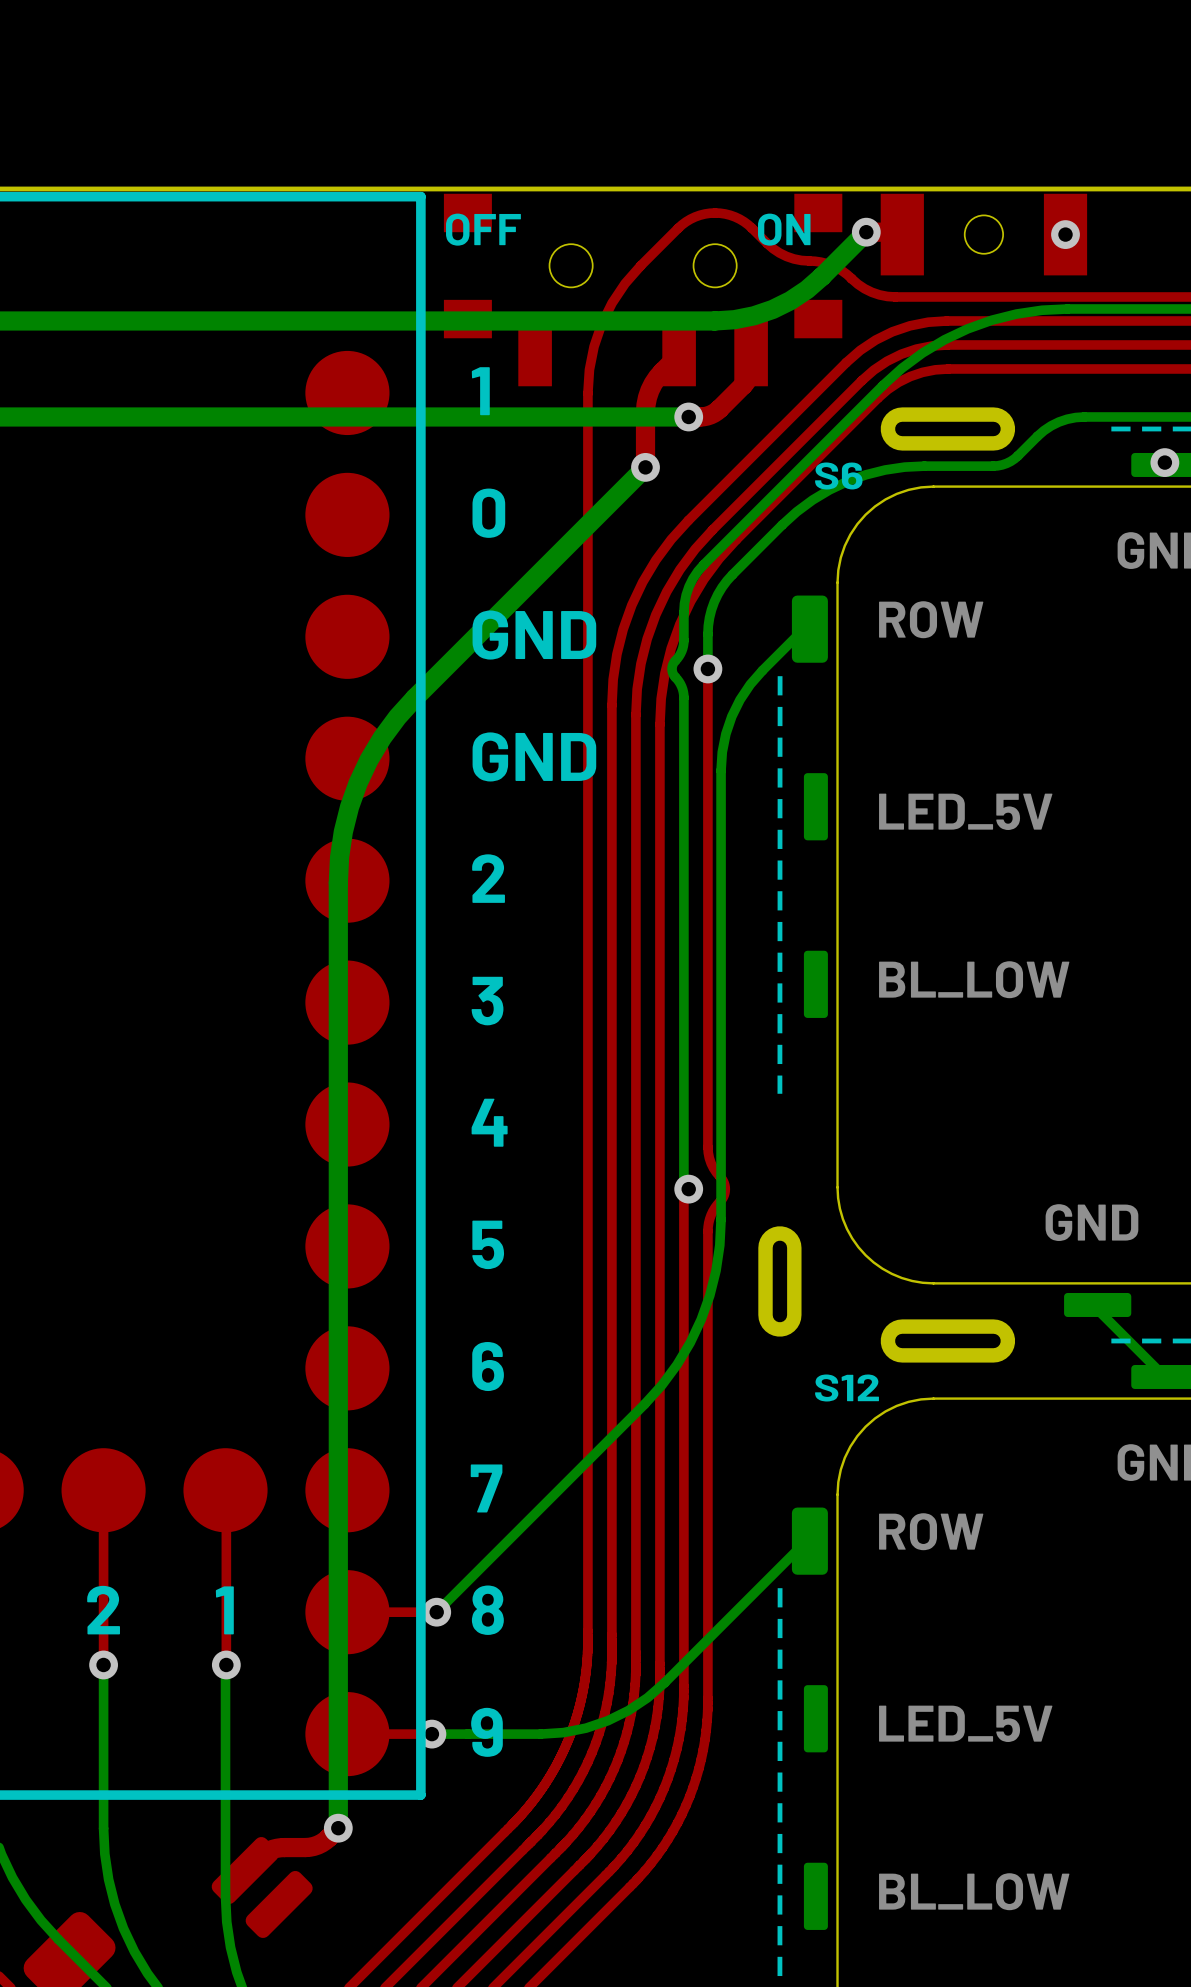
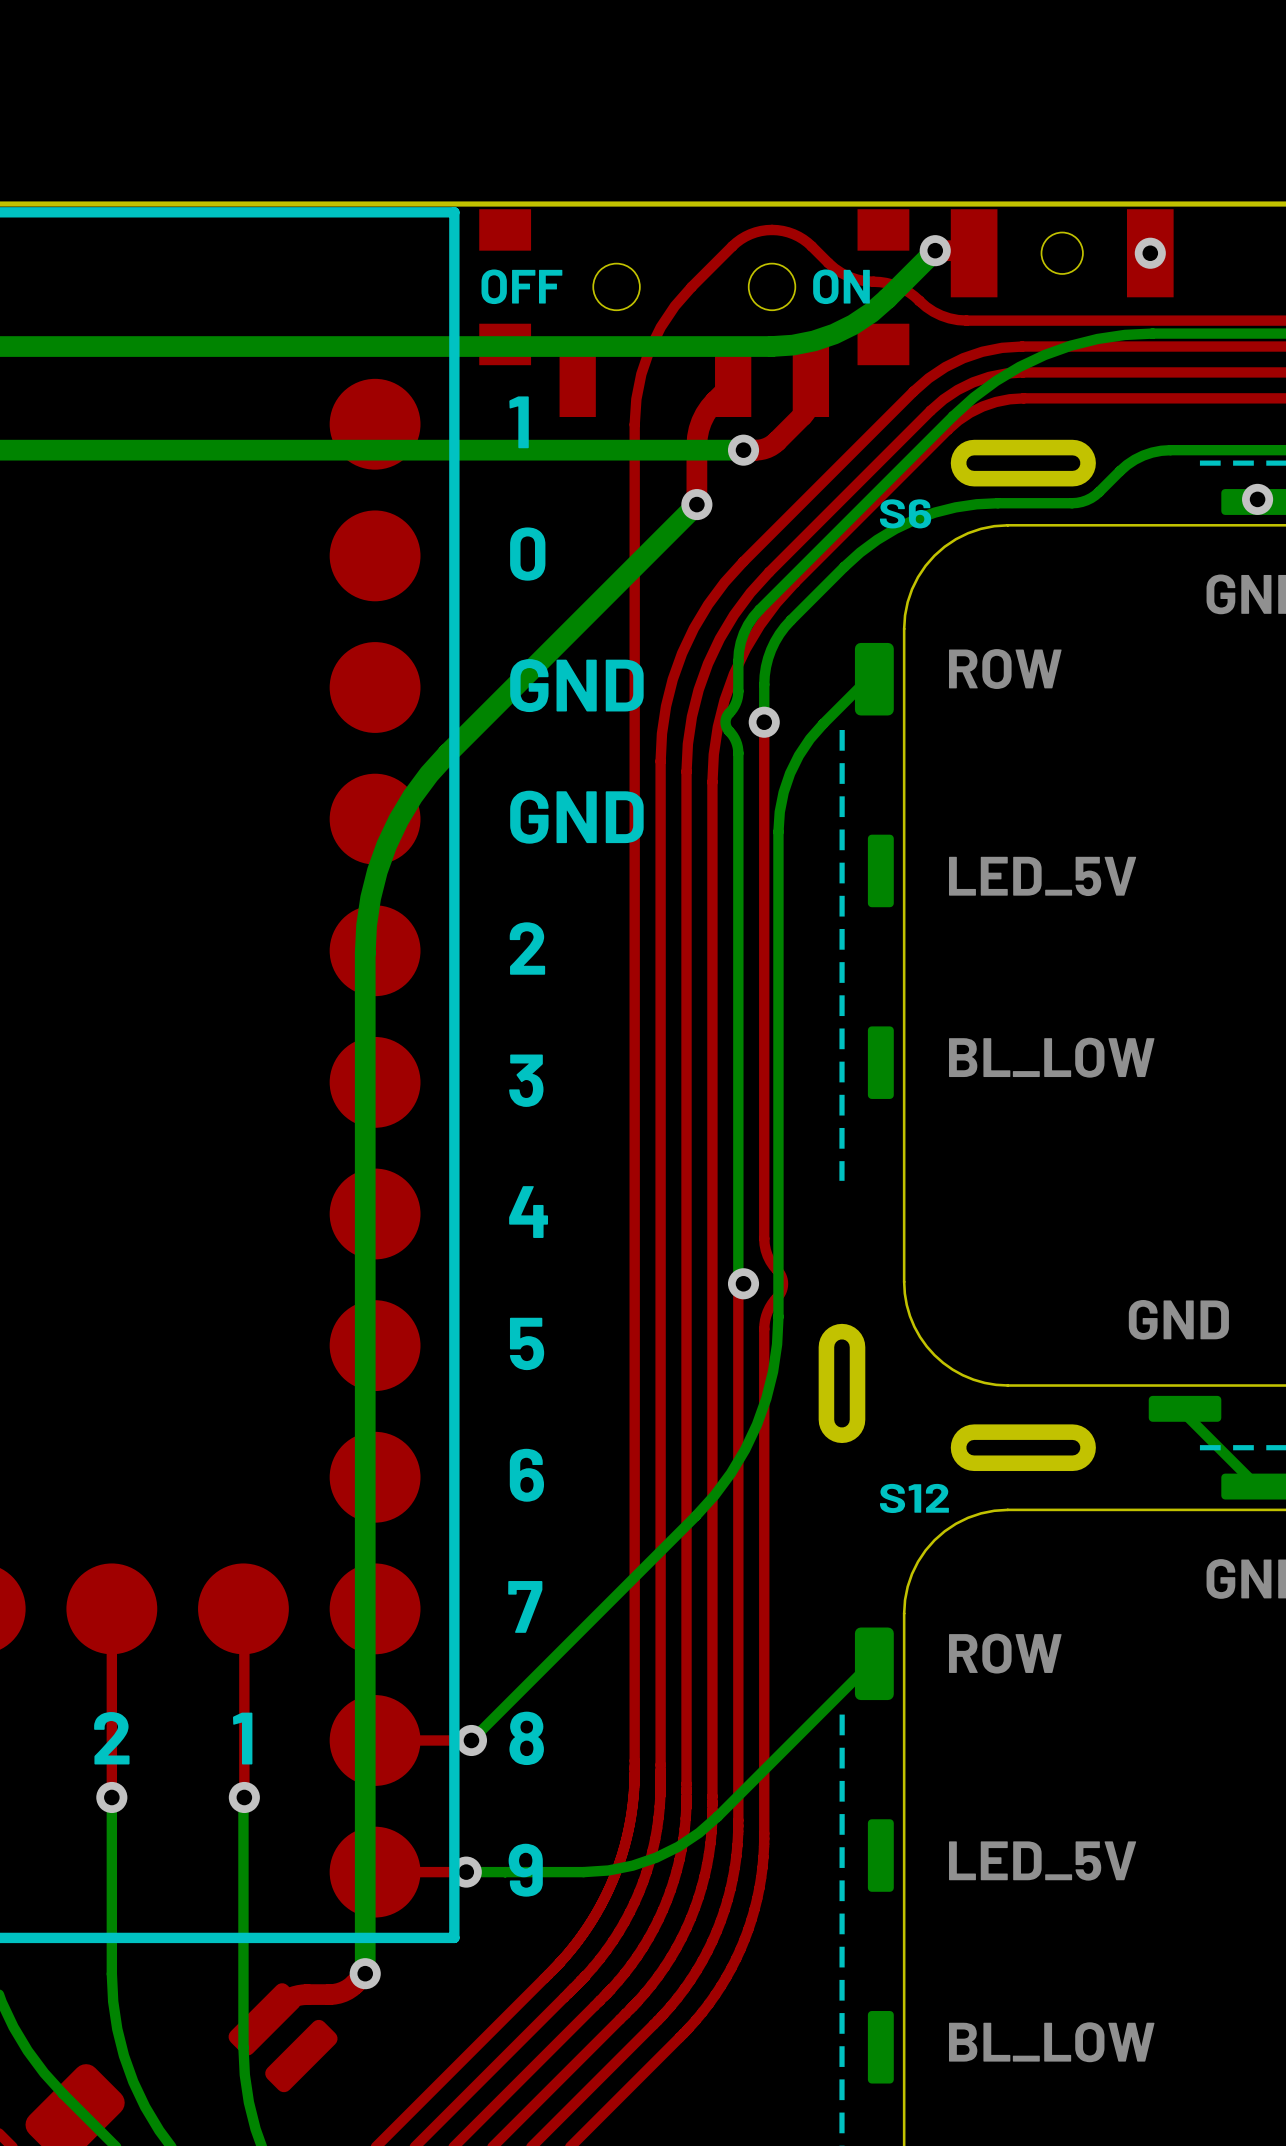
text position: OFF (483, 229) -> OFF (521, 286)
text position: ON (784, 229) -> ON (841, 286)

